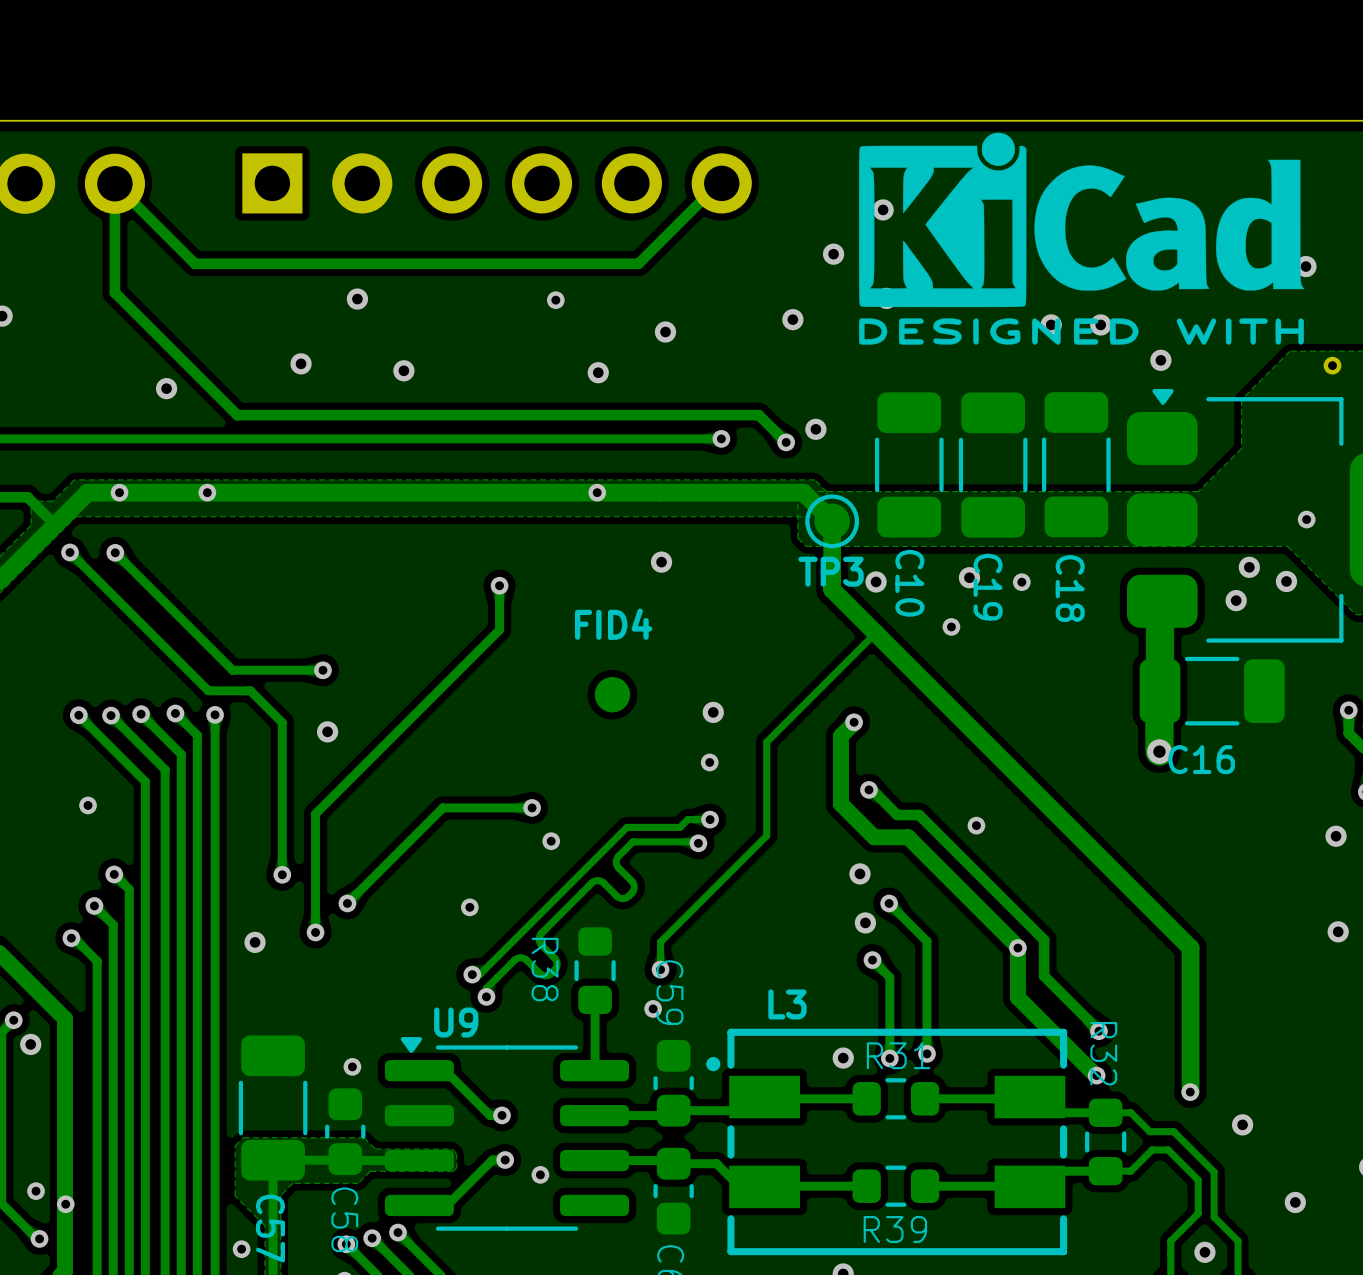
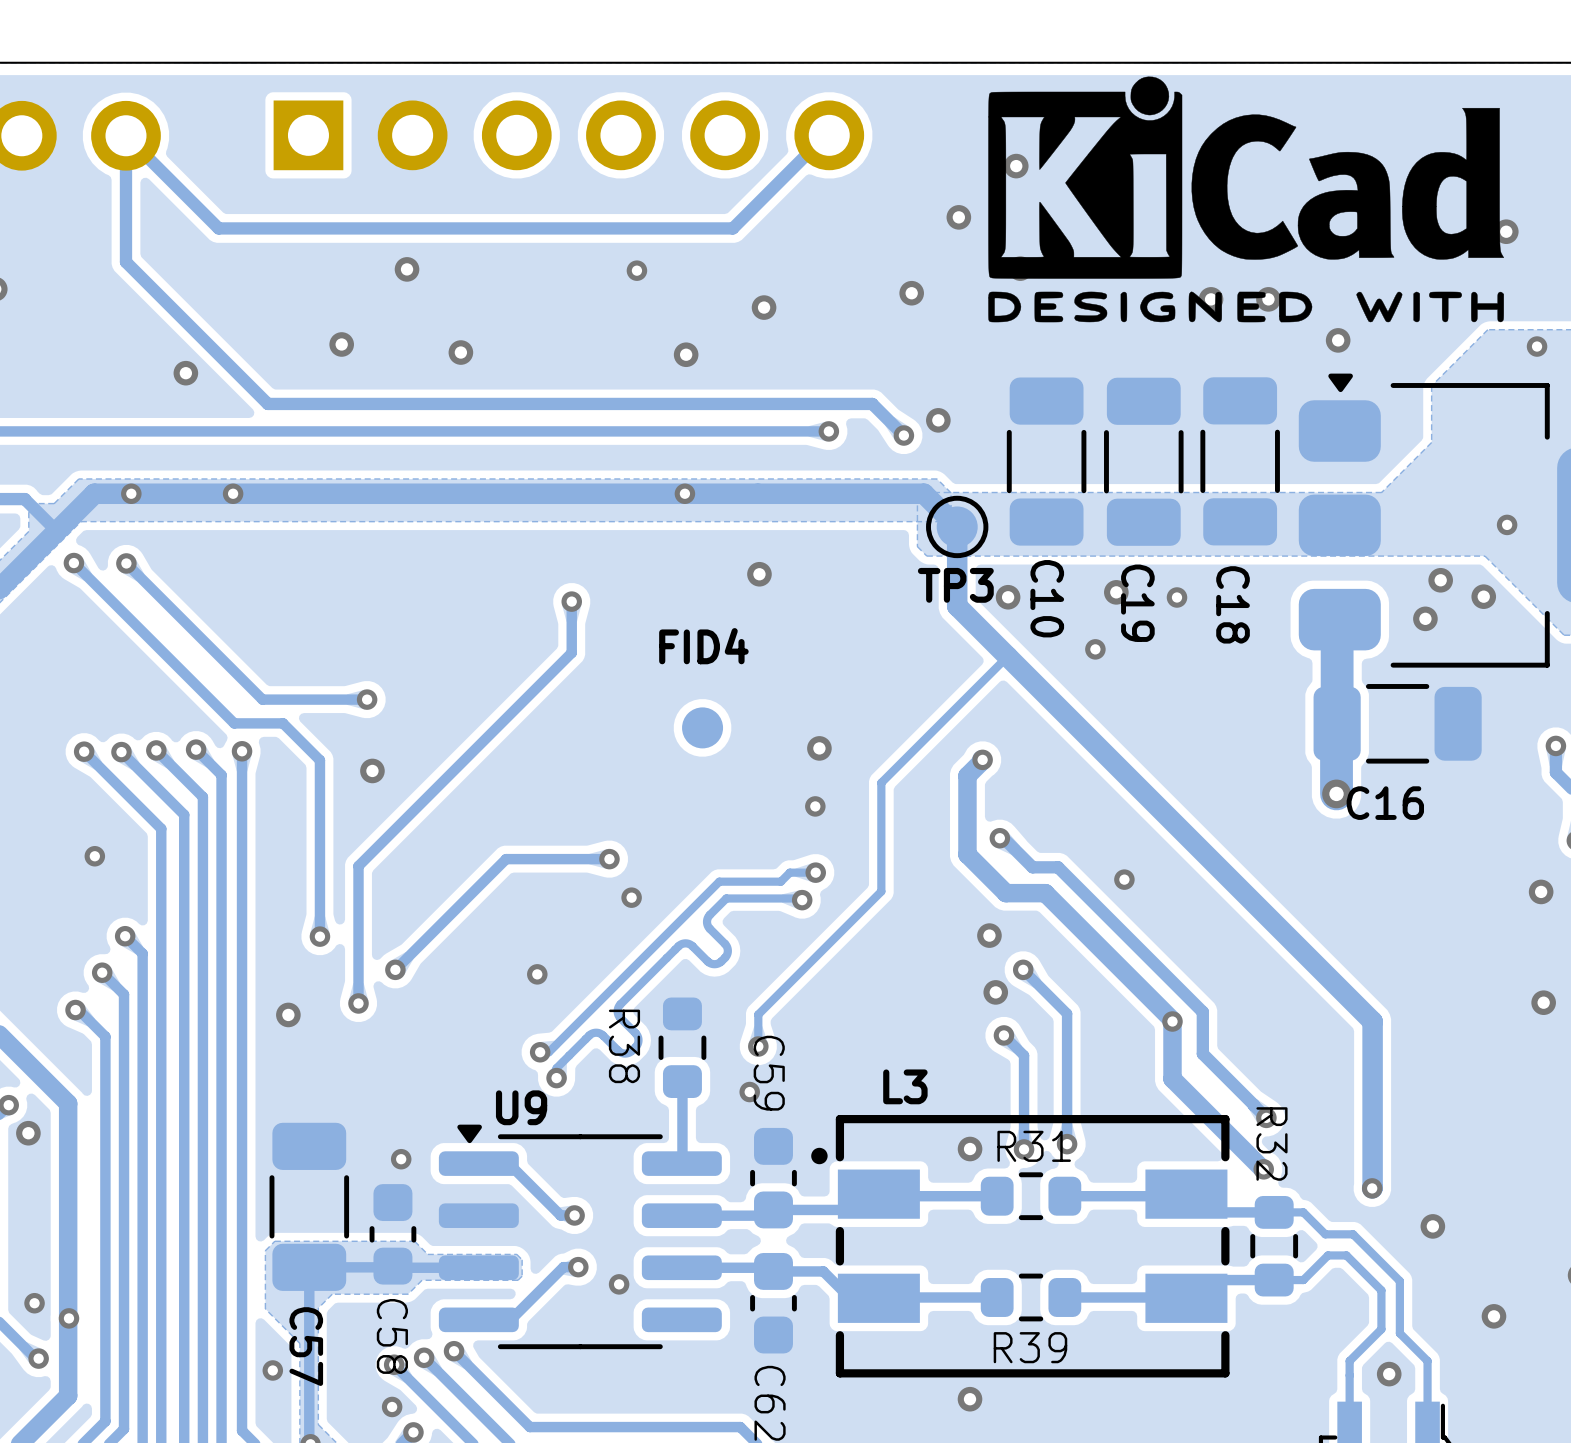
part: (1332, 365) -> none
via: none -> (1537, 346)

